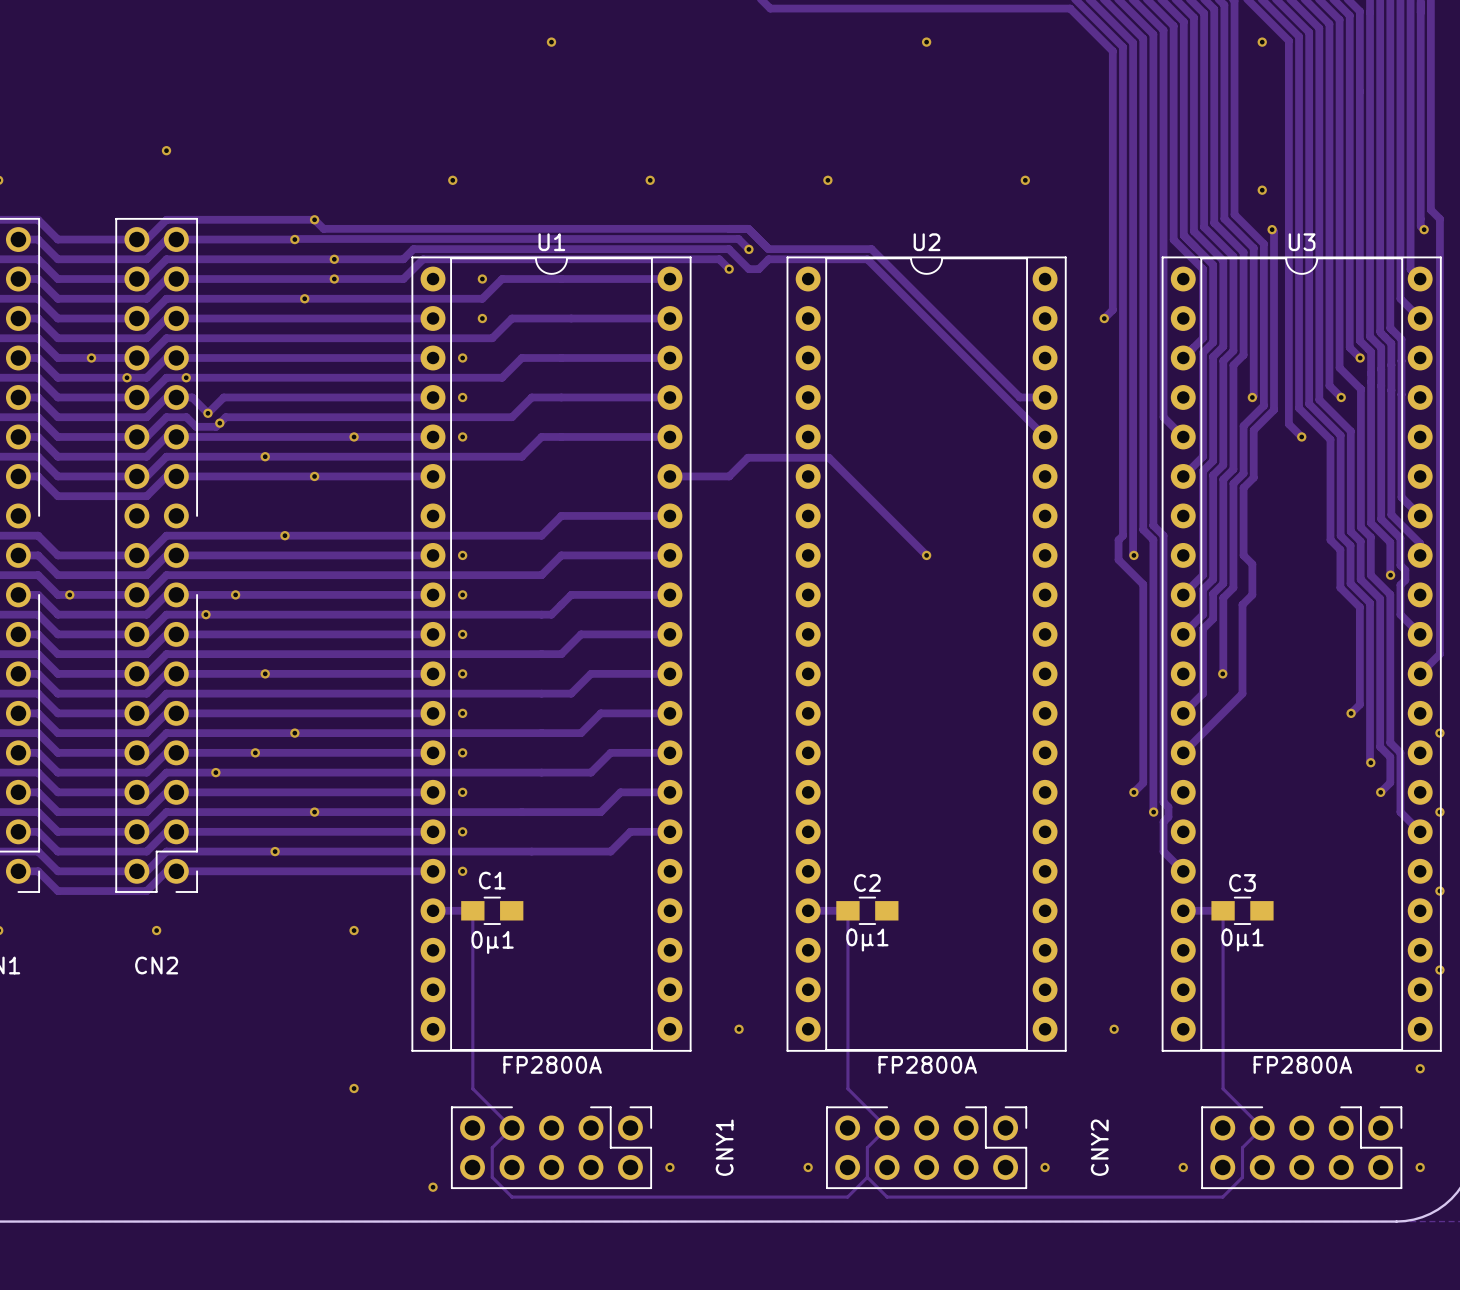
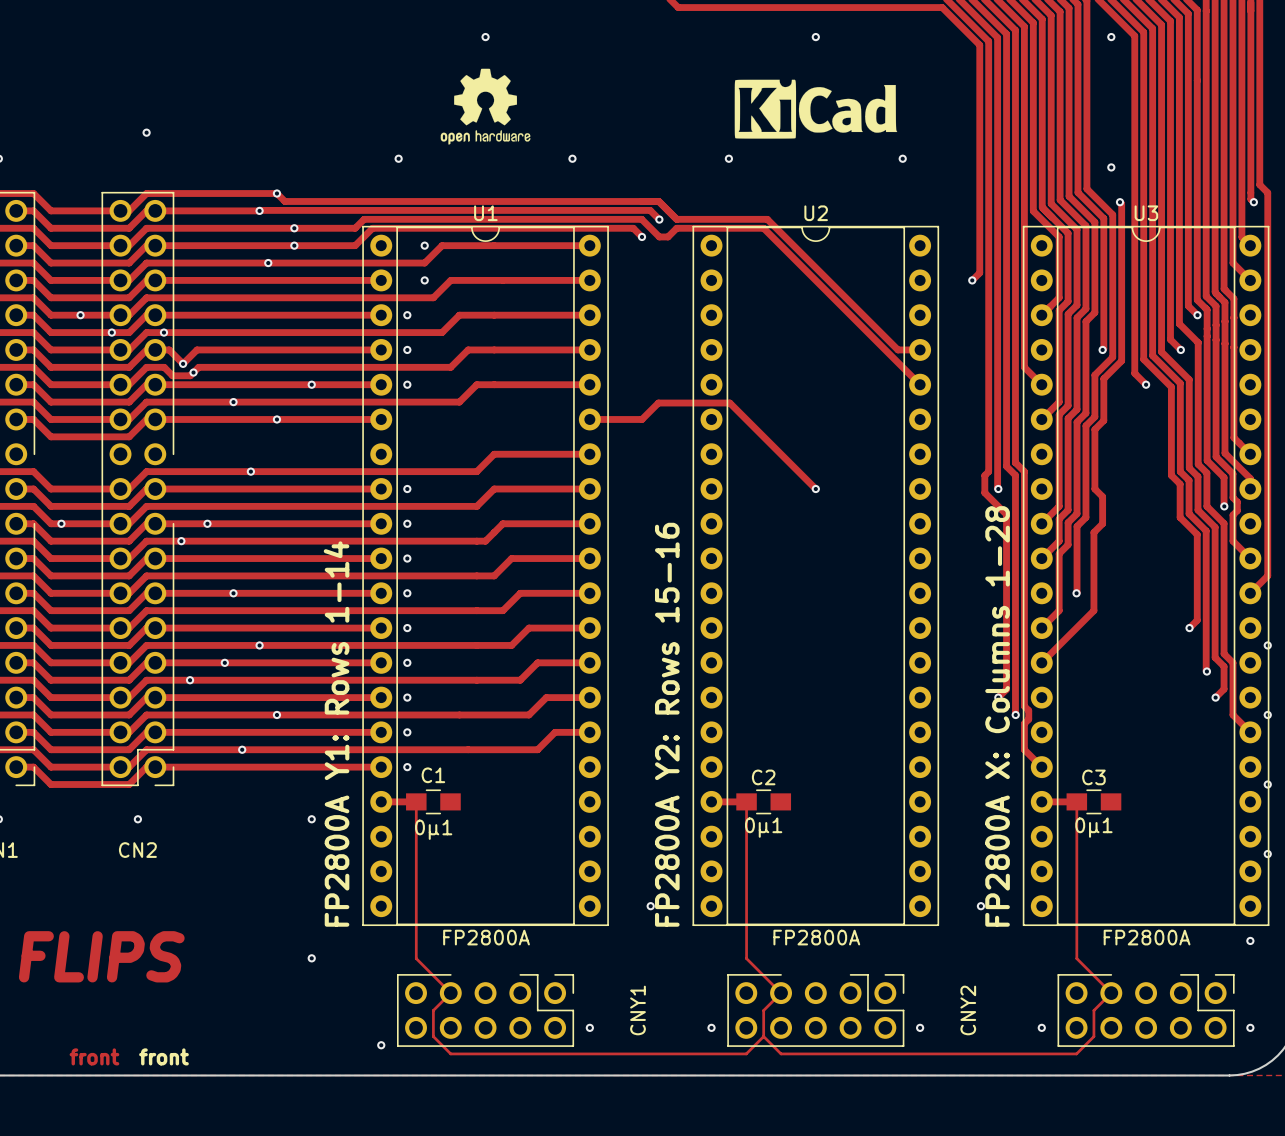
drawing: none -> [440, 68, 531, 145]
drawing: none -> [734, 79, 898, 139]
text: none -> FP2800A X: Columns 1-28 (997, 716)
text: none -> FP2800A Y2: Rows 15-16 (667, 724)
text: none -> FP2800A Y1: Rows 1-14 (336, 734)
text: none -> FLIPS (101, 956)
text: none -> front (94, 1056)
text: none -> front (163, 1056)

